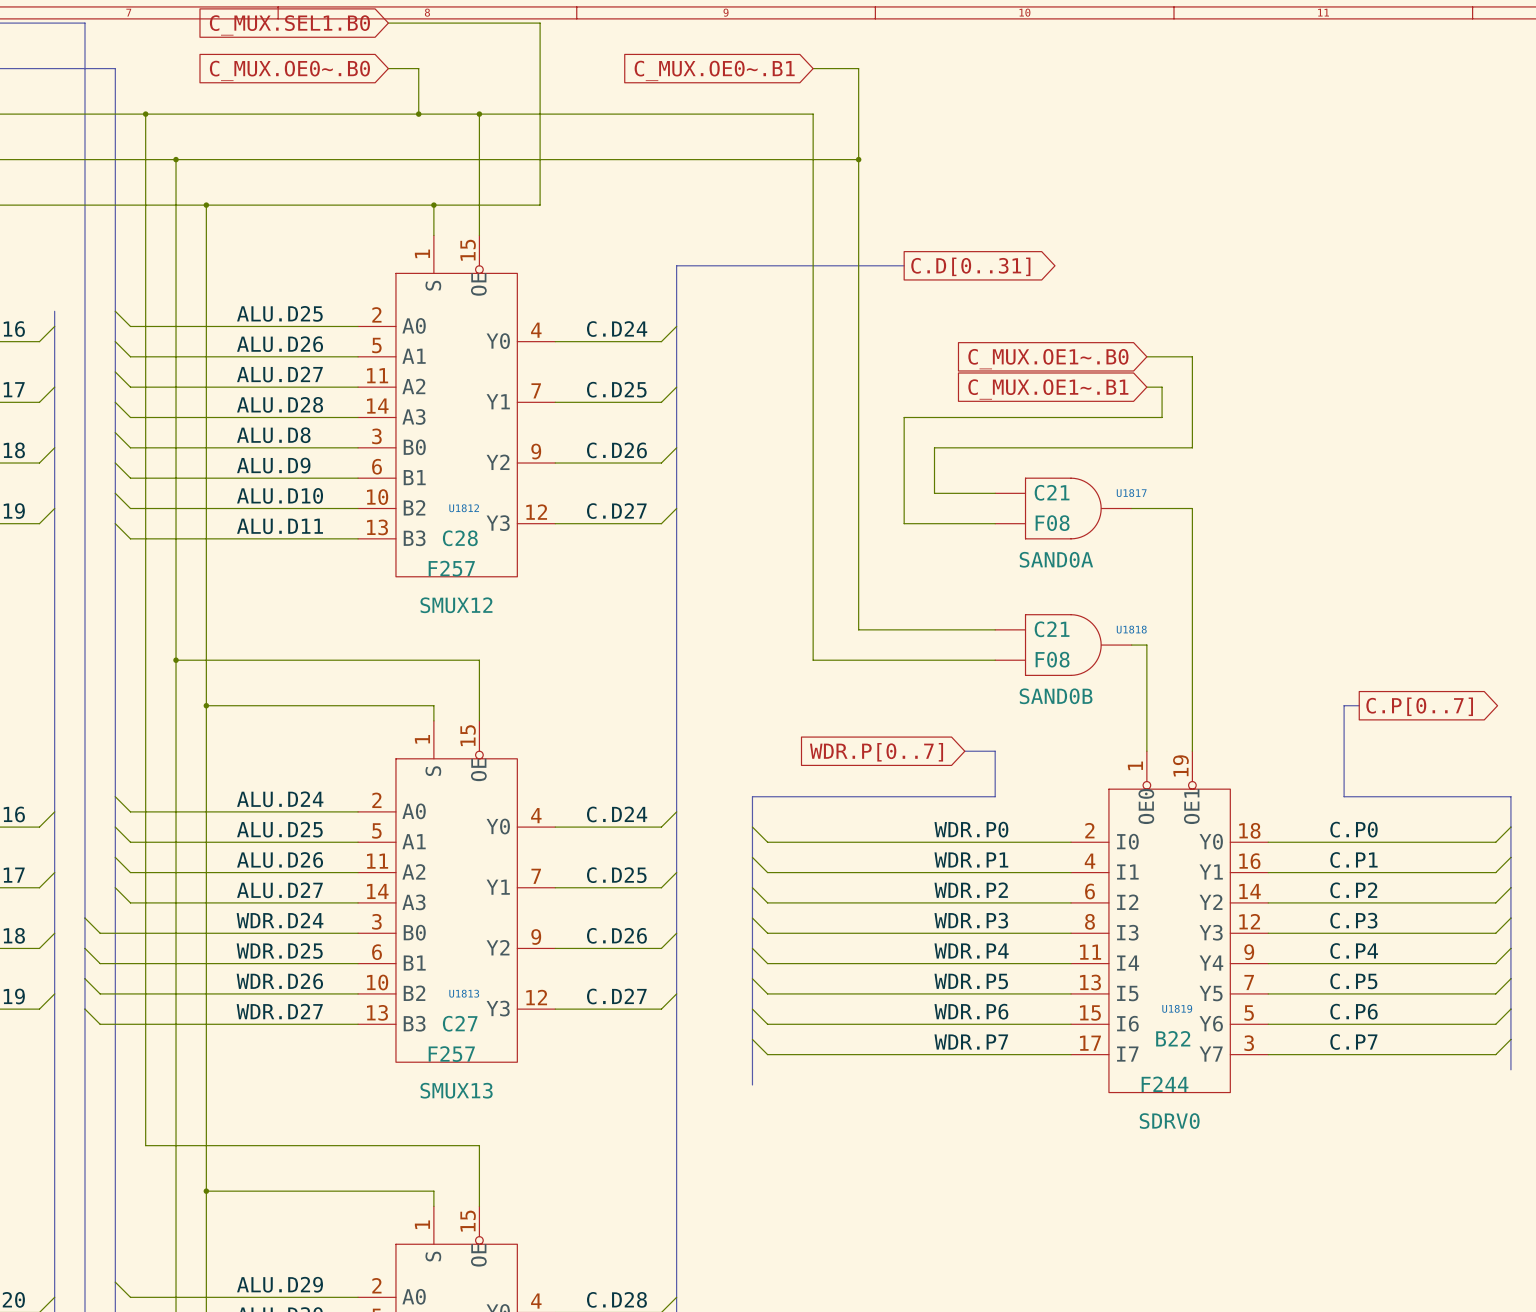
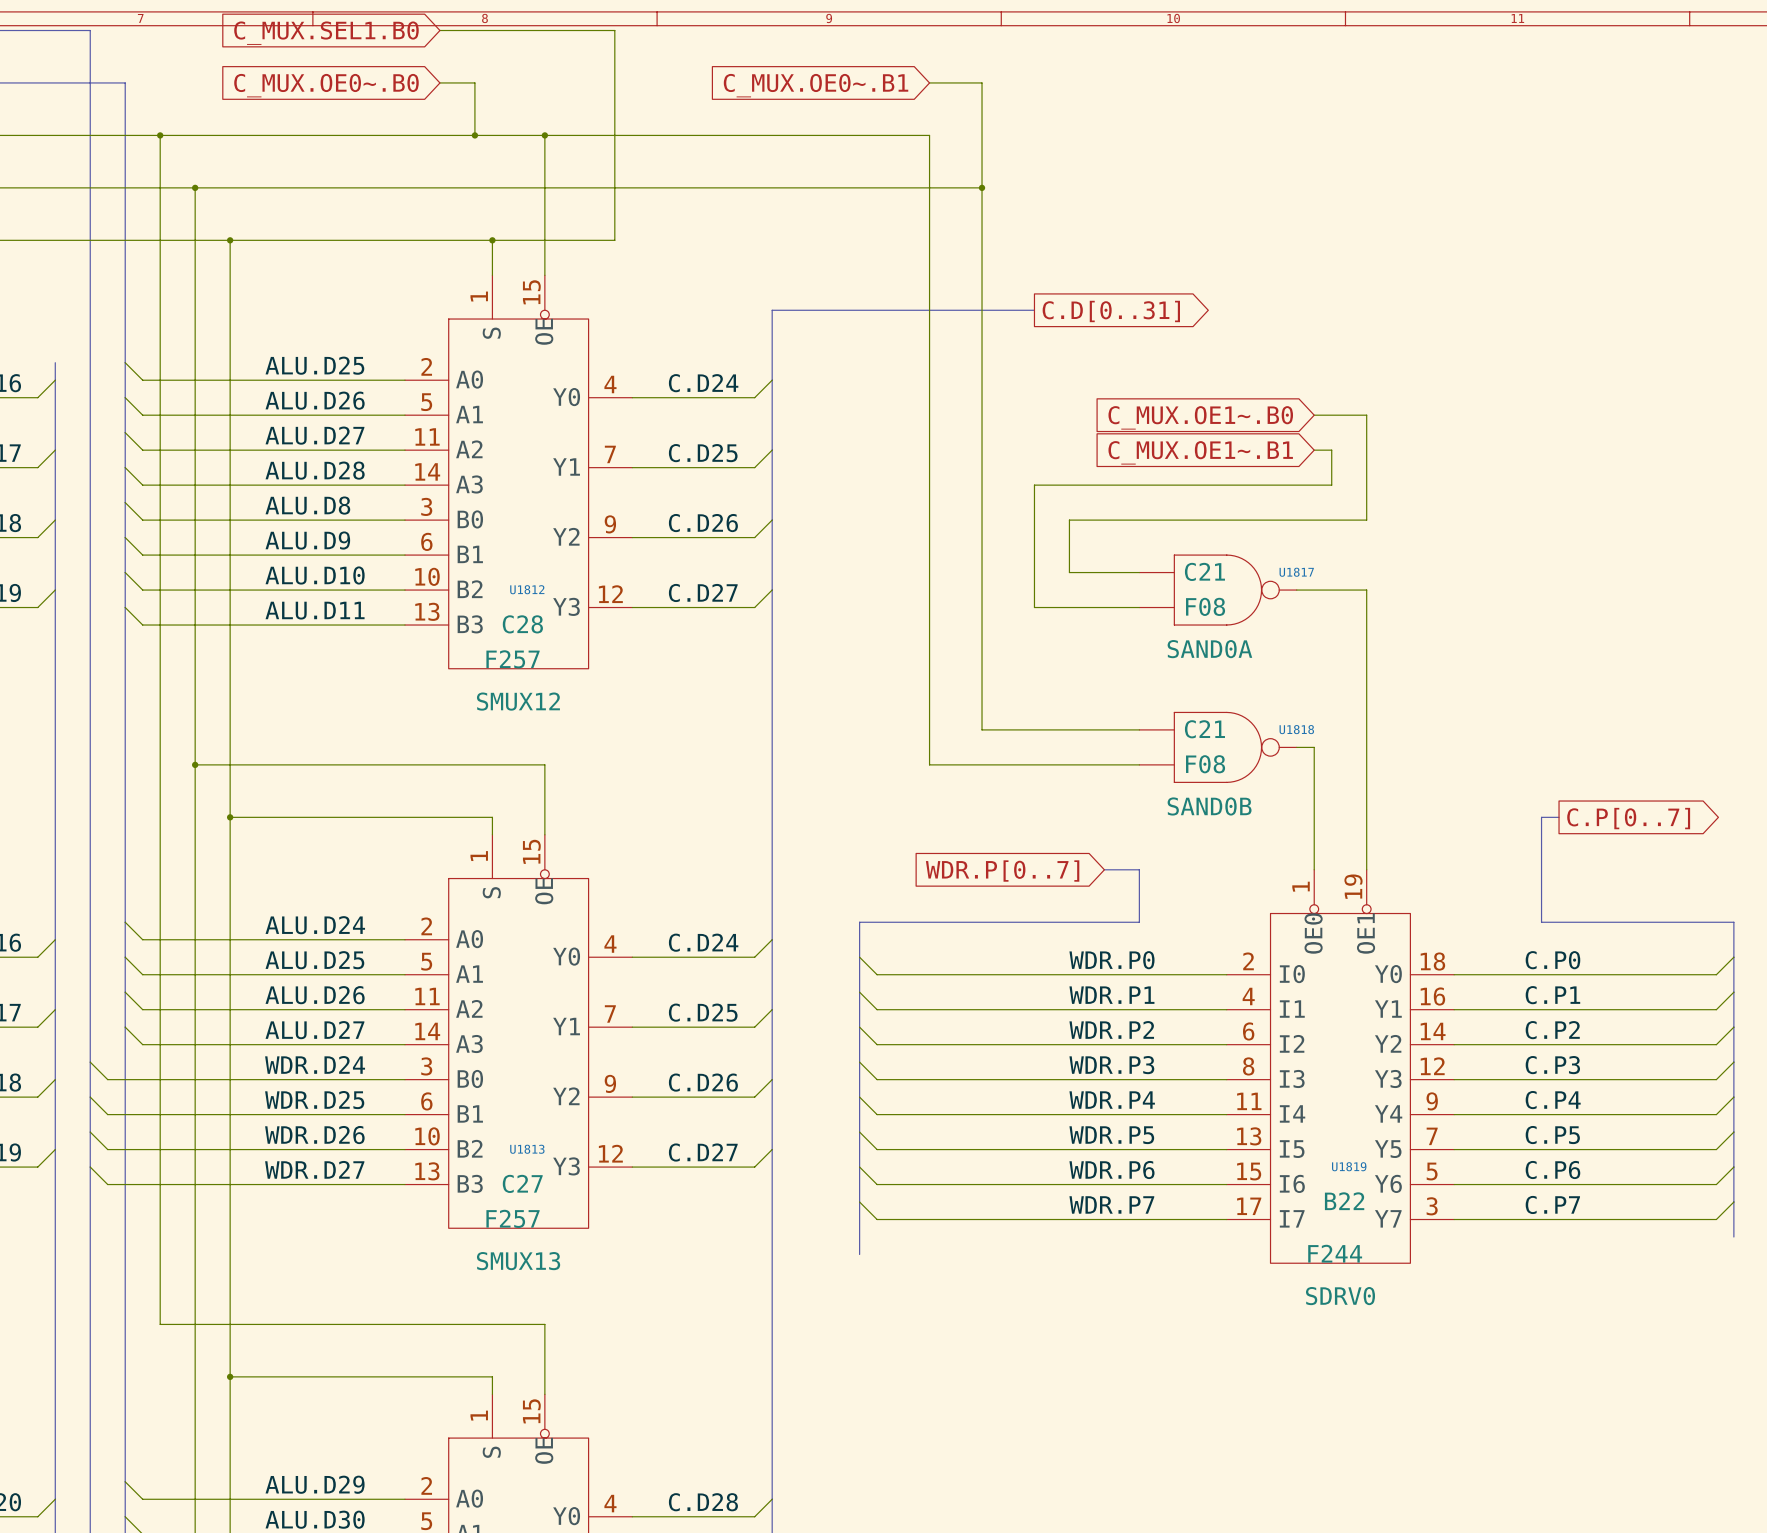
U1817 symbol: [995, 477, 1132, 540] -> [1139, 554, 1297, 626]
U1818 symbol: [995, 614, 1132, 676] -> [1139, 711, 1297, 783]

